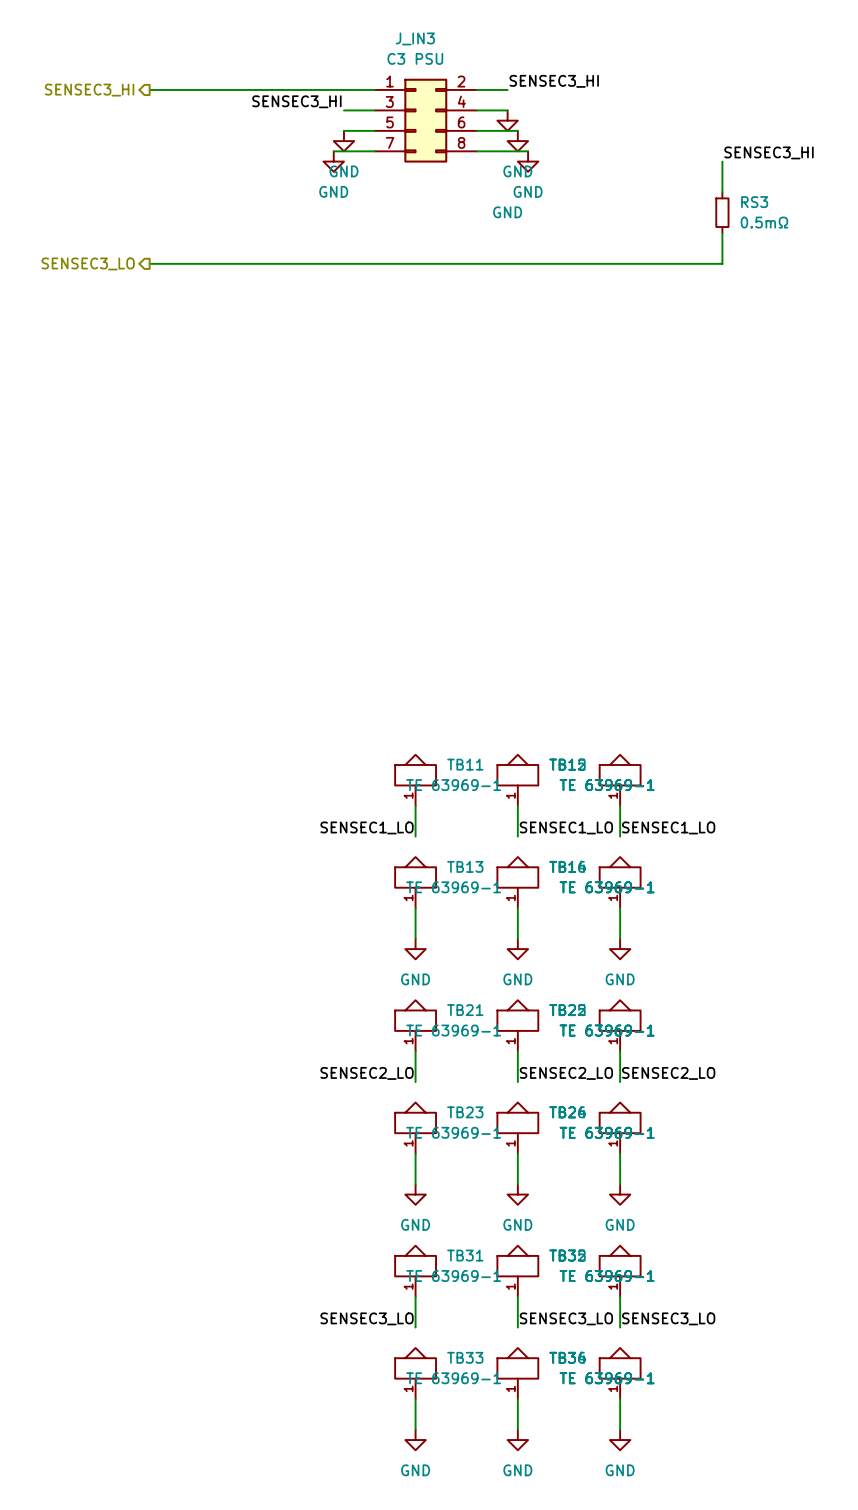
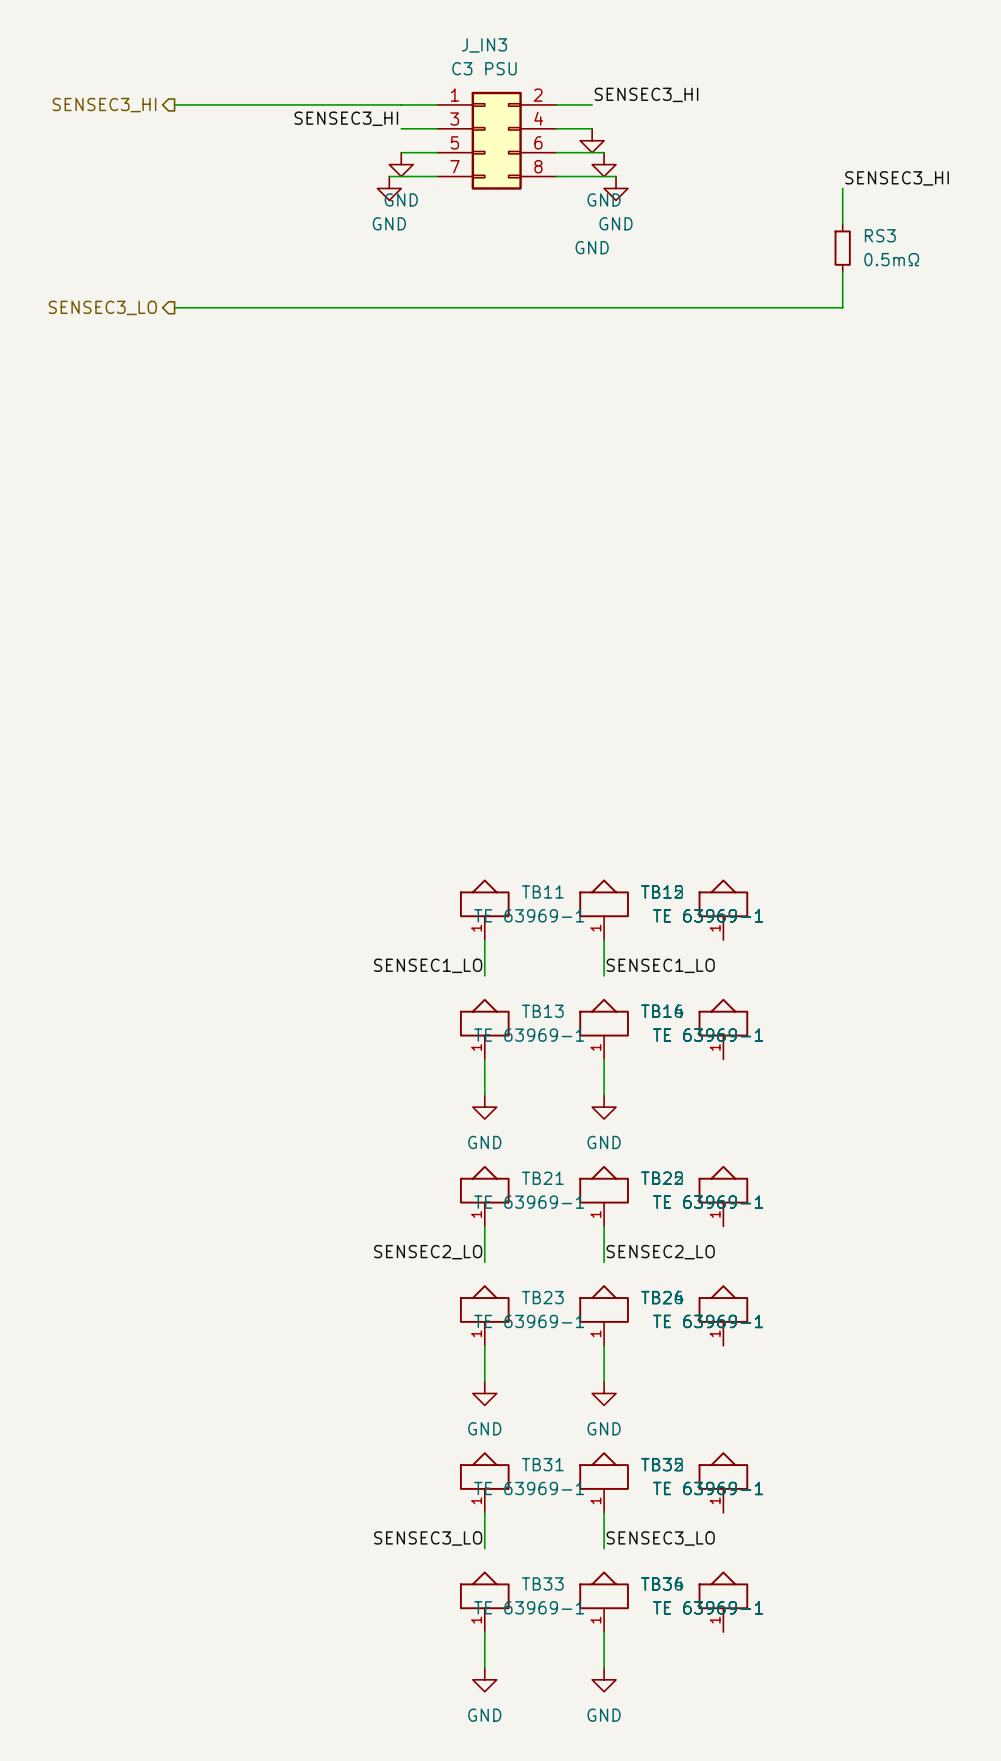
wire: (620, 805) (620, 836) -> none
label: SENSEC1_LO (668, 827) -> none
wire: (620, 908) (620, 938) -> none
power symbol: GND (620, 949) -> none
wire: (620, 1051) (620, 1082) -> none
label: SENSEC2_LO (668, 1073) -> none
wire: (620, 1153) (620, 1184) -> none
power symbol: GND (620, 1194) -> none
wire: (620, 1296) (620, 1327) -> none
label: SENSEC3_LO (668, 1318) -> none
wire: (620, 1399) (620, 1429) -> none
power symbol: GND (620, 1440) -> none

